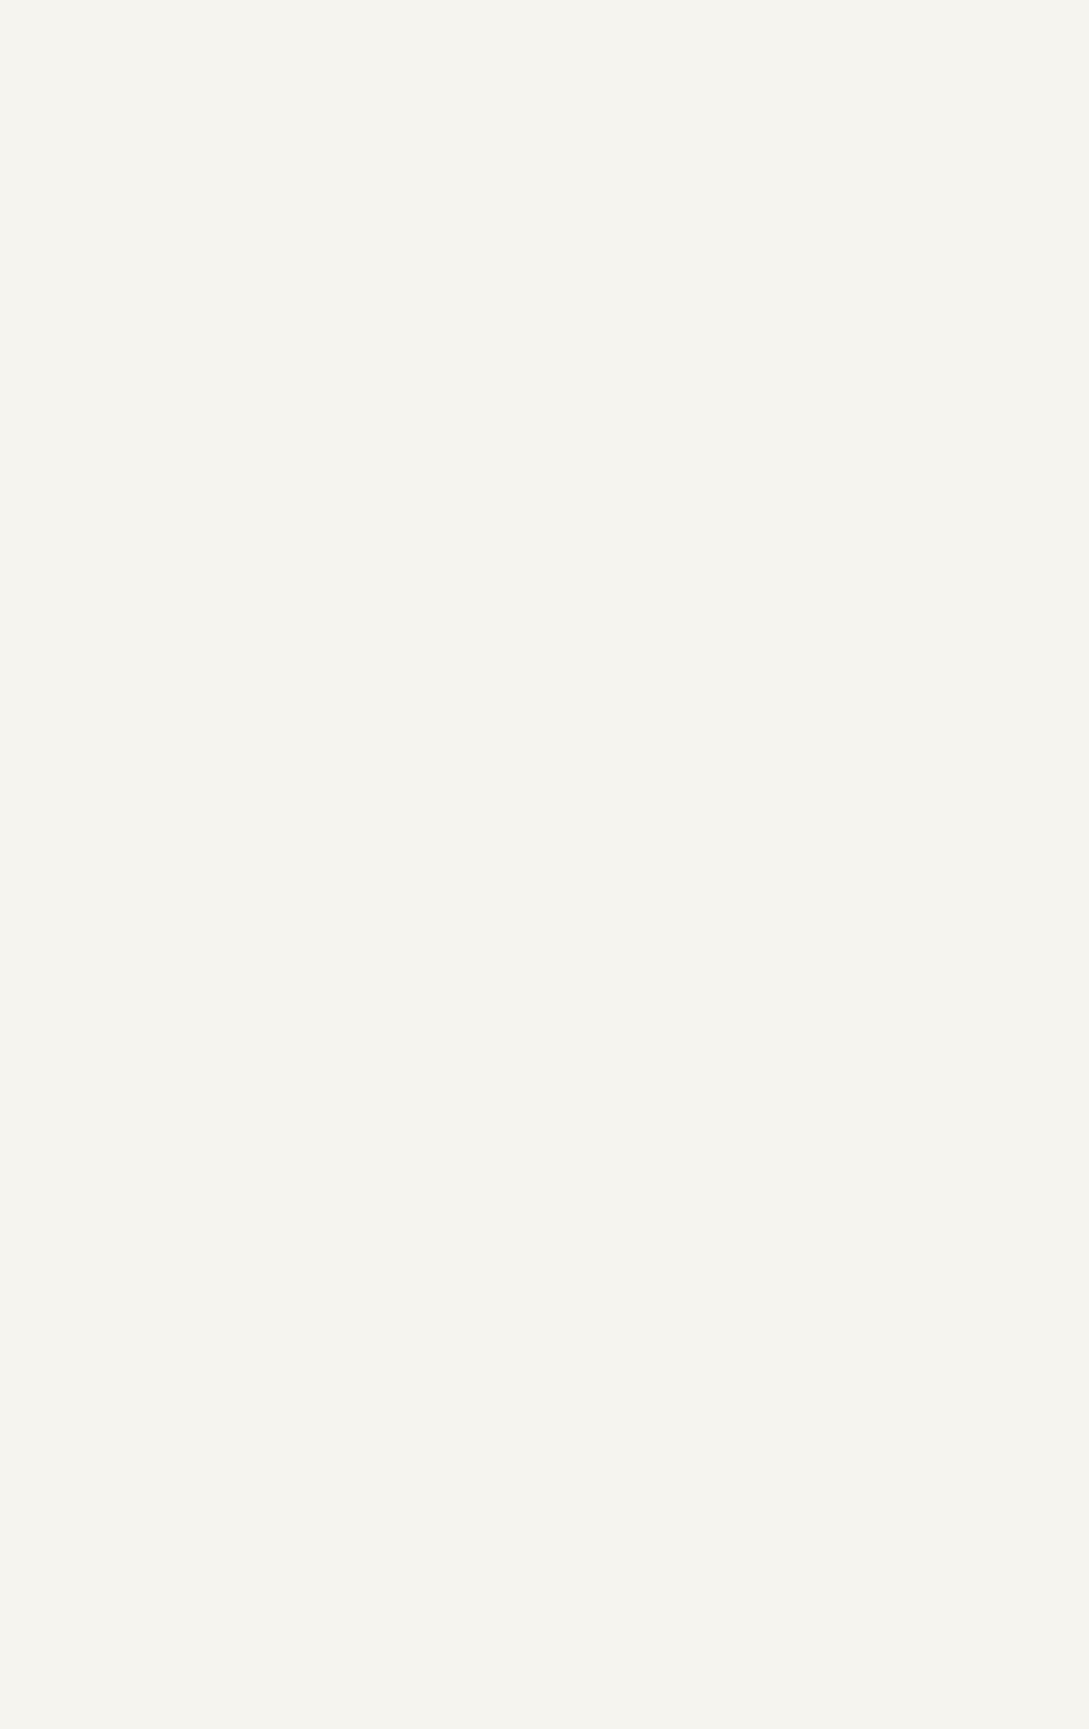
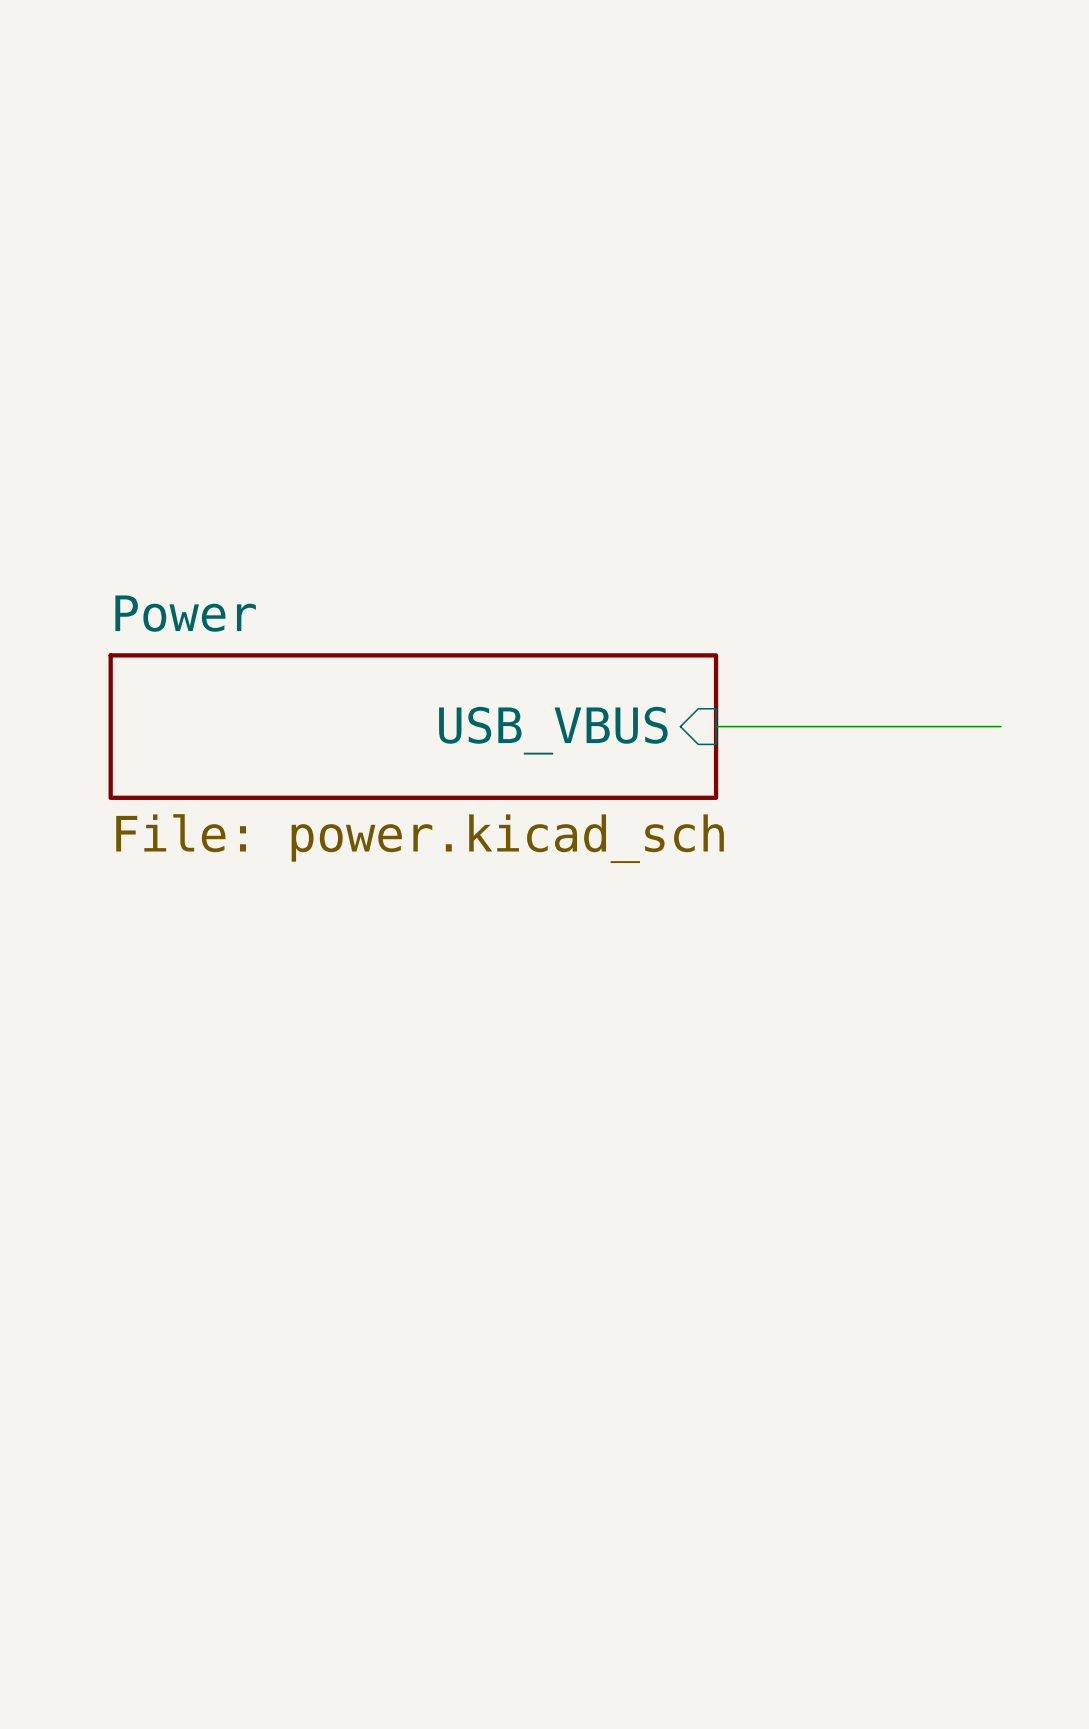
sheet Power: none -> File: power.kicad_sch (413, 726)
wire: none -> (716, 726) (1000, 726)
sheet pin: none -> USB_VBUS (553, 730)

